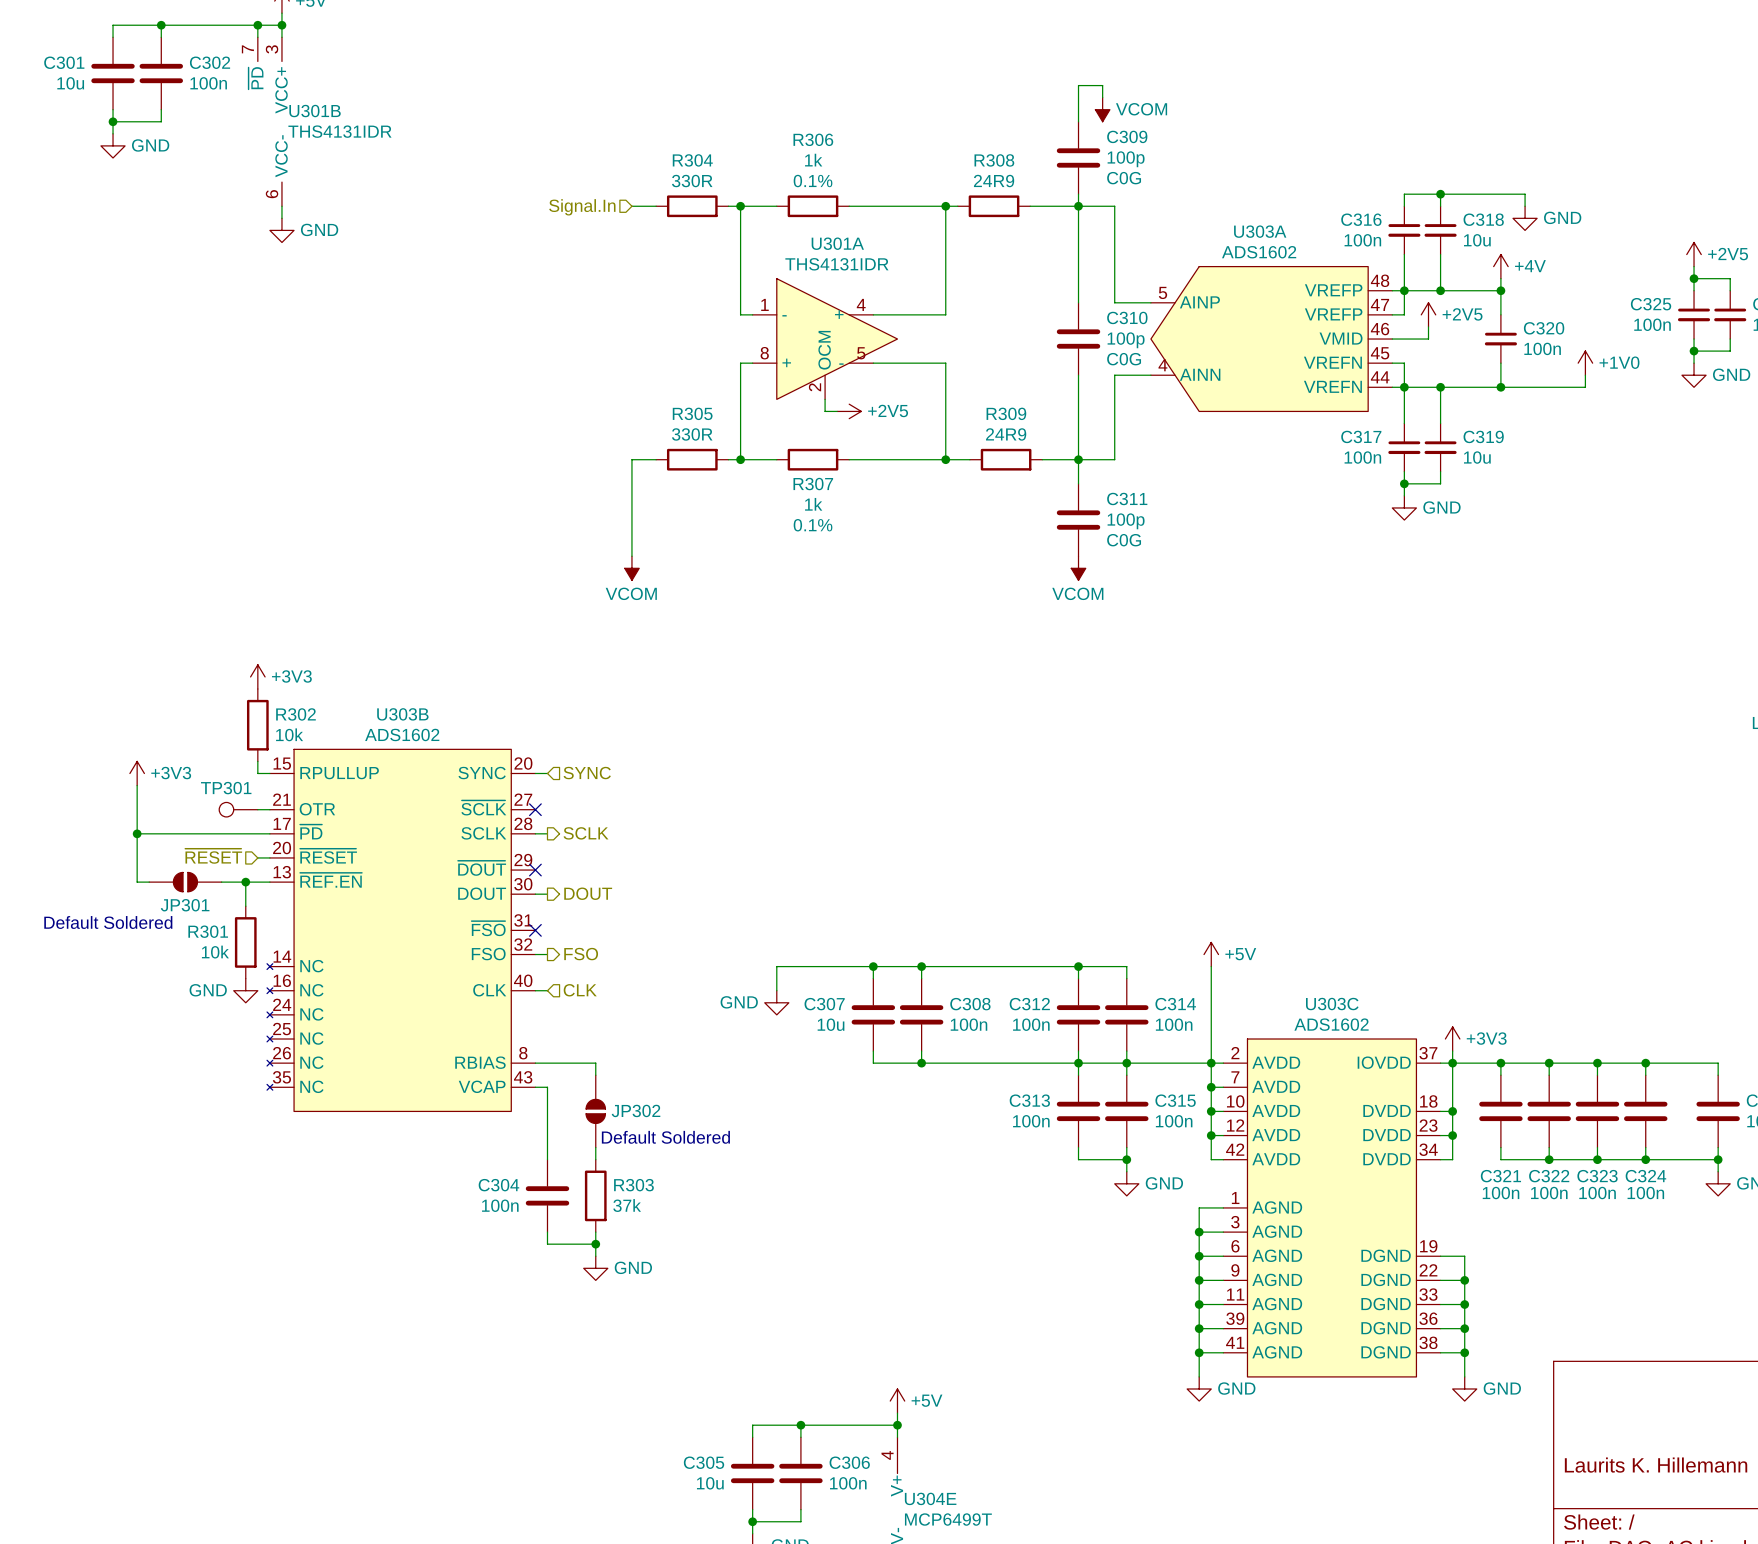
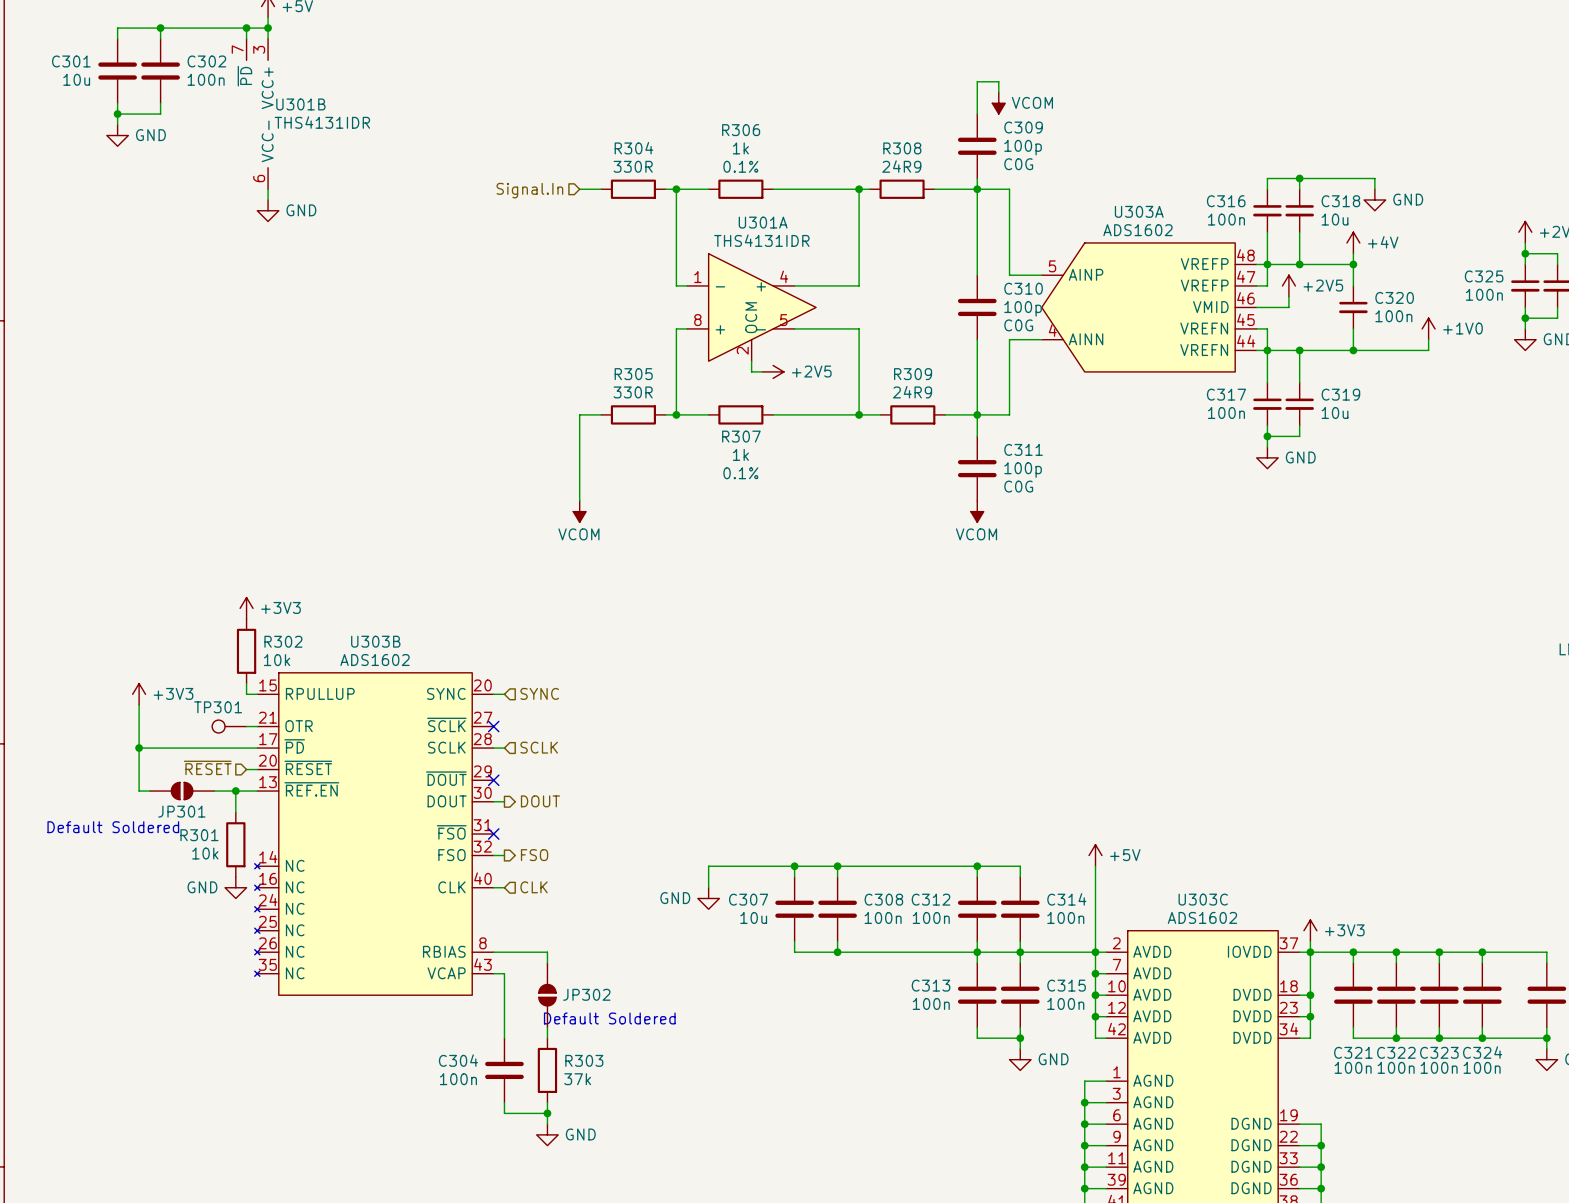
hierarchical label shape: output (586, 833) -> input (539, 747)

